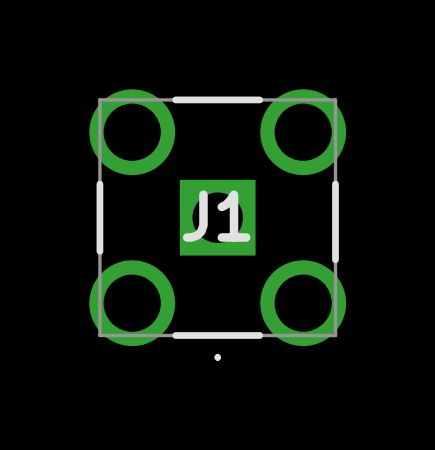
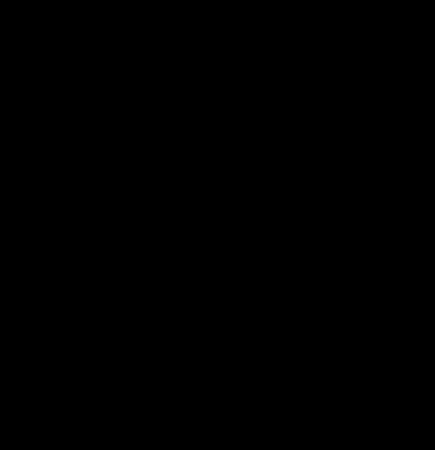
J1: (217, 225) -> none

